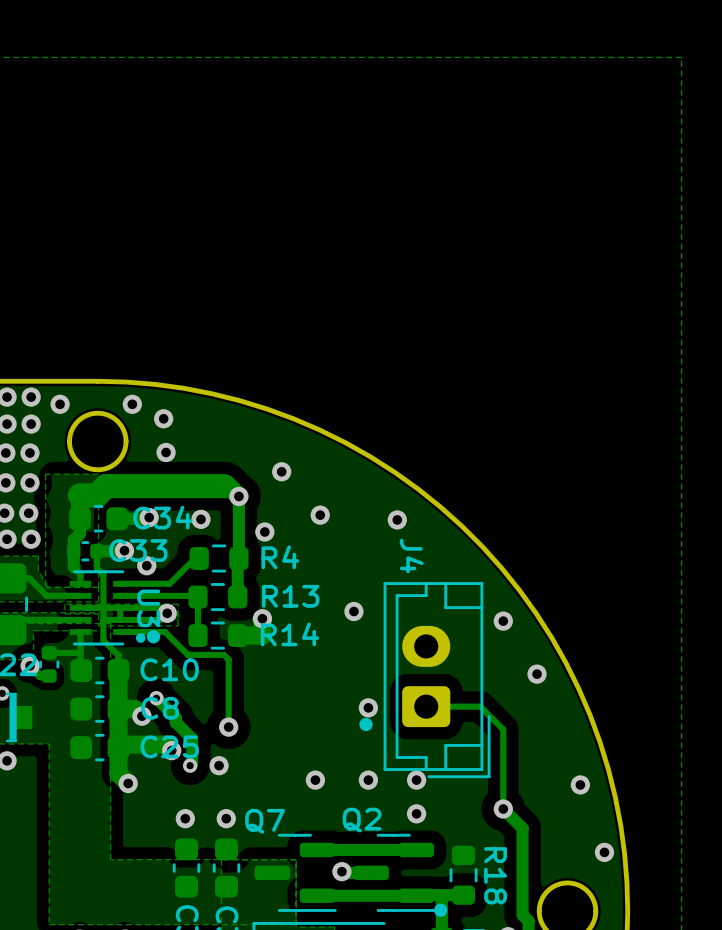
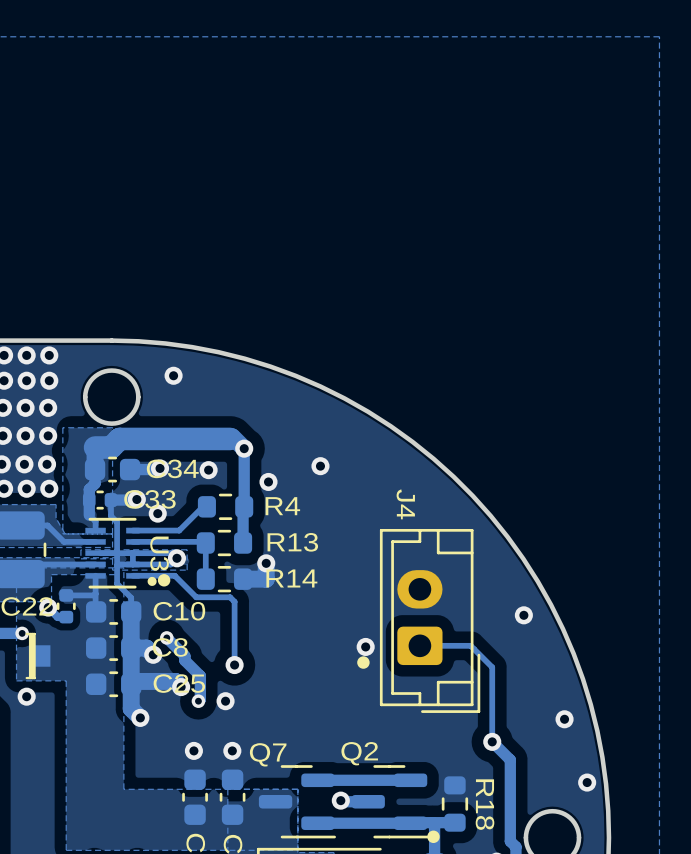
via: (60, 404) -> none
via: (132, 404) -> none
via: (166, 452) -> none
via: (281, 471) -> none
via: (397, 519) -> none
via: (353, 611) -> none
via: (503, 621) -> none
via: (315, 780) -> none
via: (368, 780) -> none
via: (416, 780) -> none
via: (416, 813) -> none

